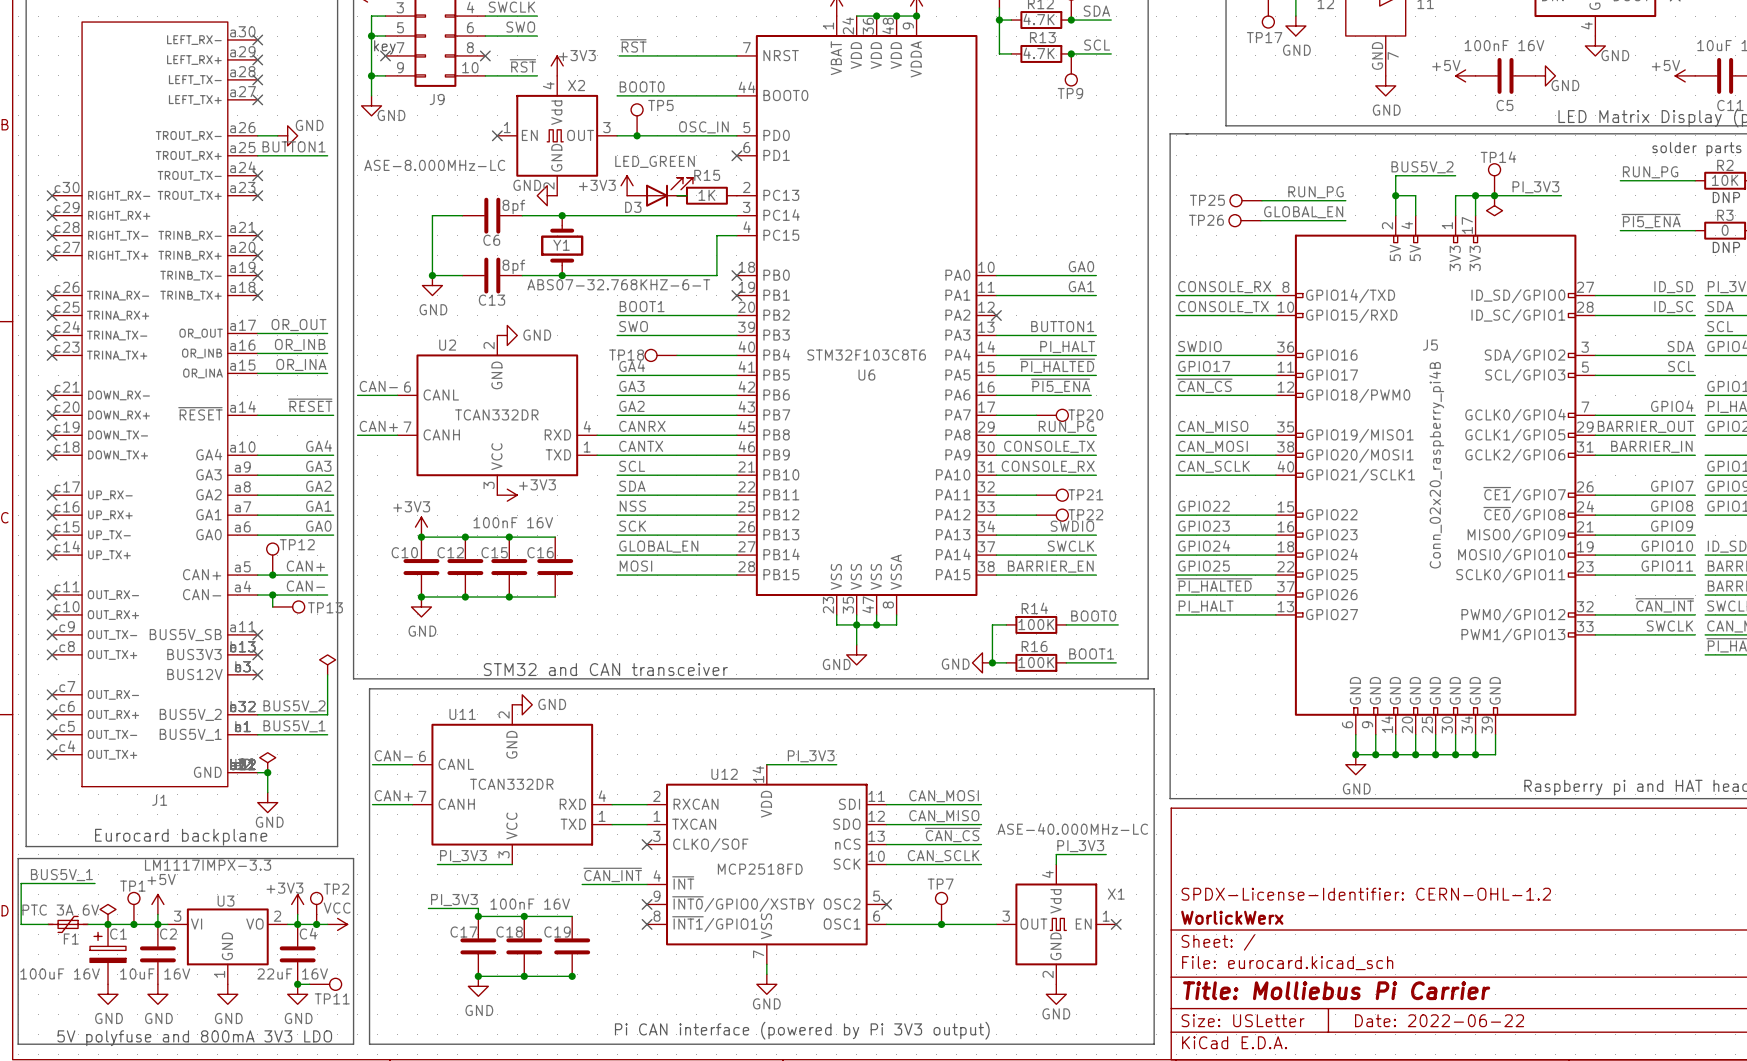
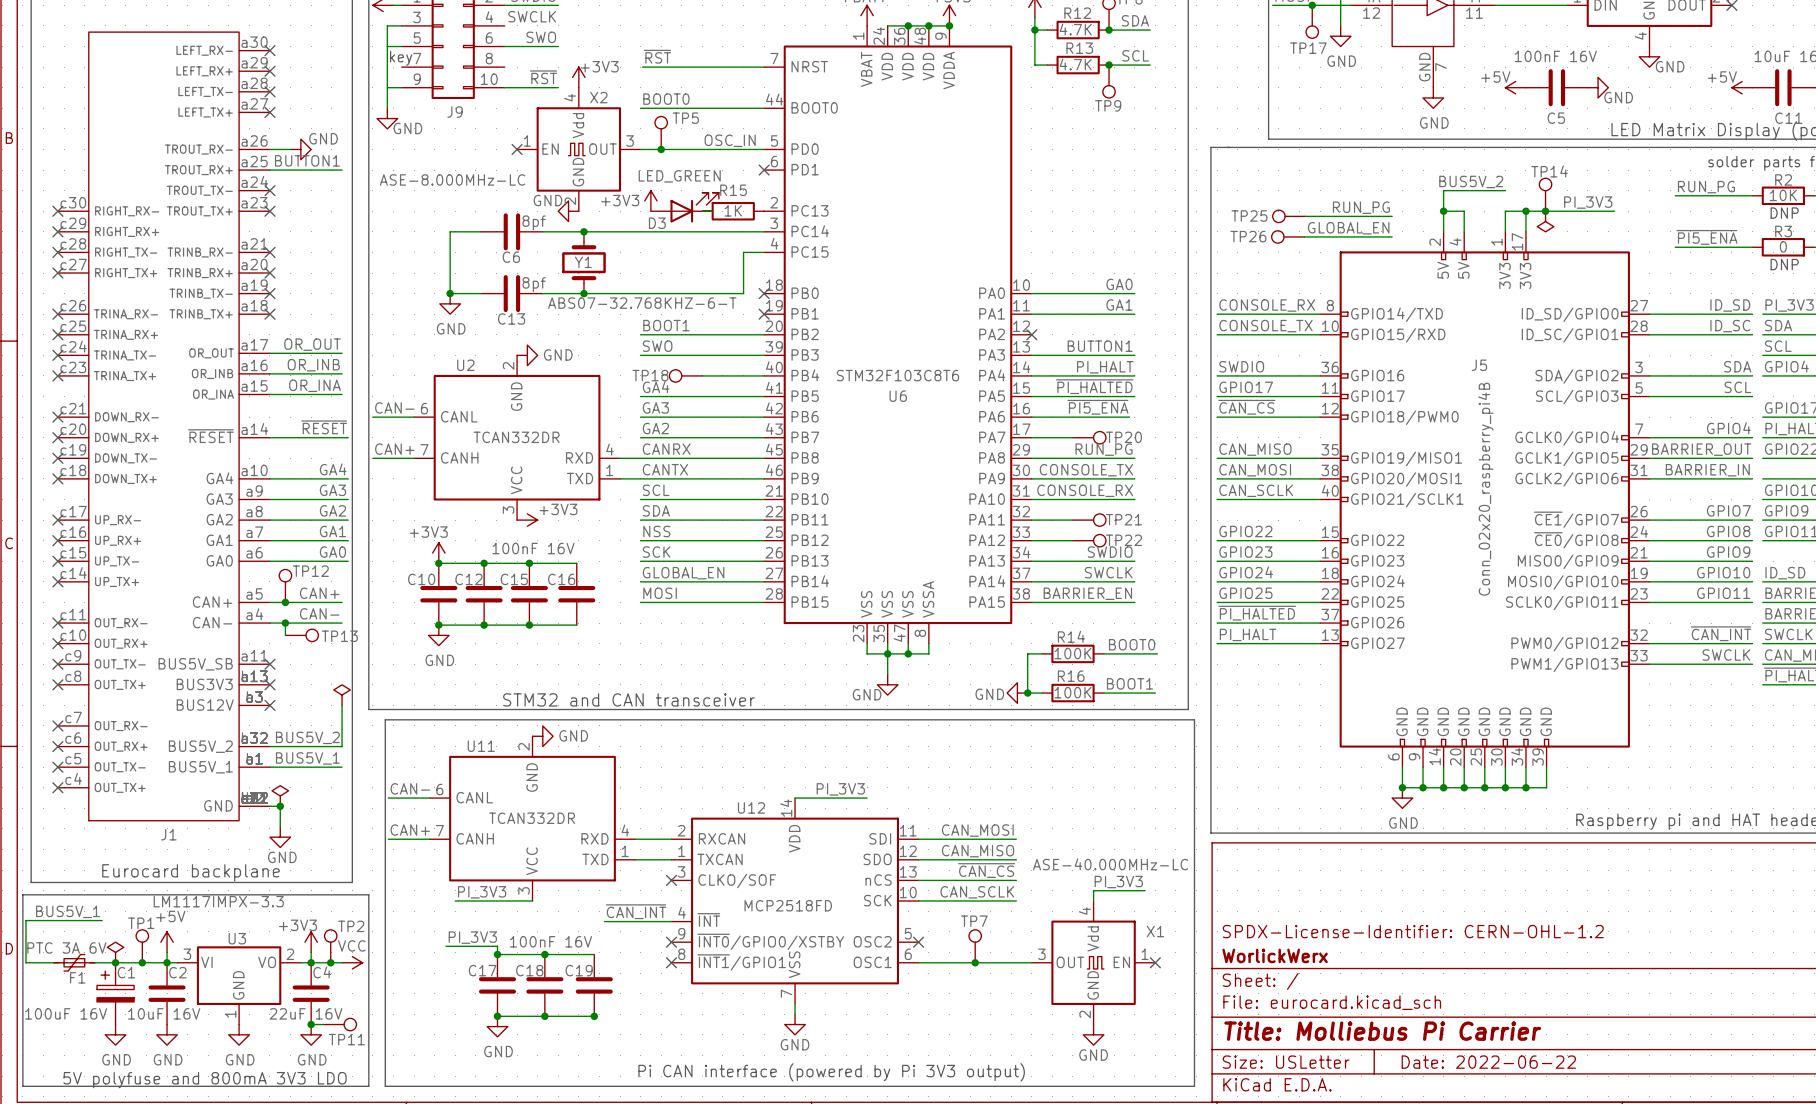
wire: (485, 16) (537, 16) -> none
junction: (371, 36) -> none
no-connect mark: (385, 55) -> none
no-connect mark: (485, 55) -> none
junction: (371, 75) -> none

